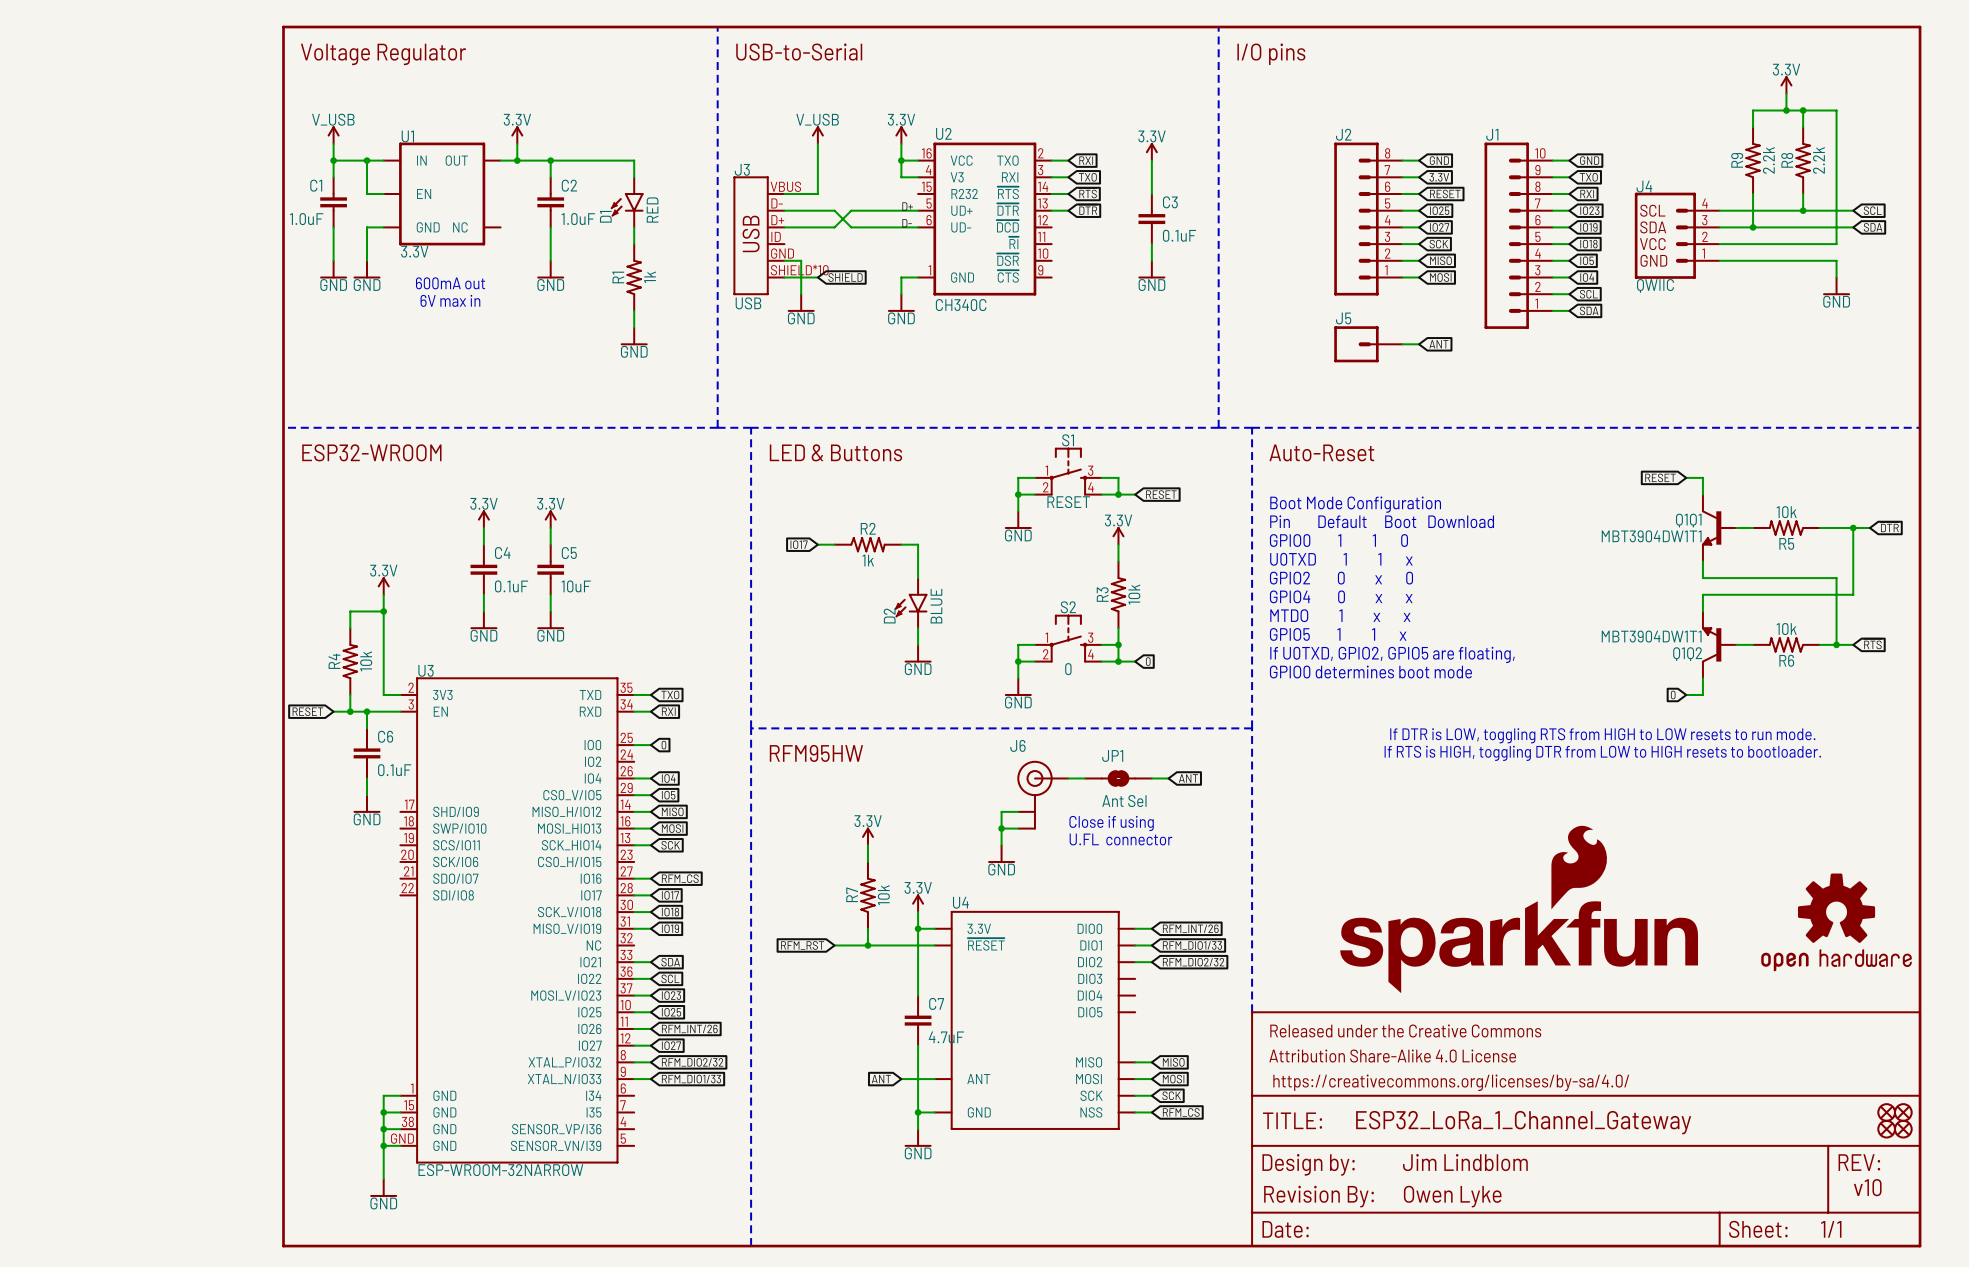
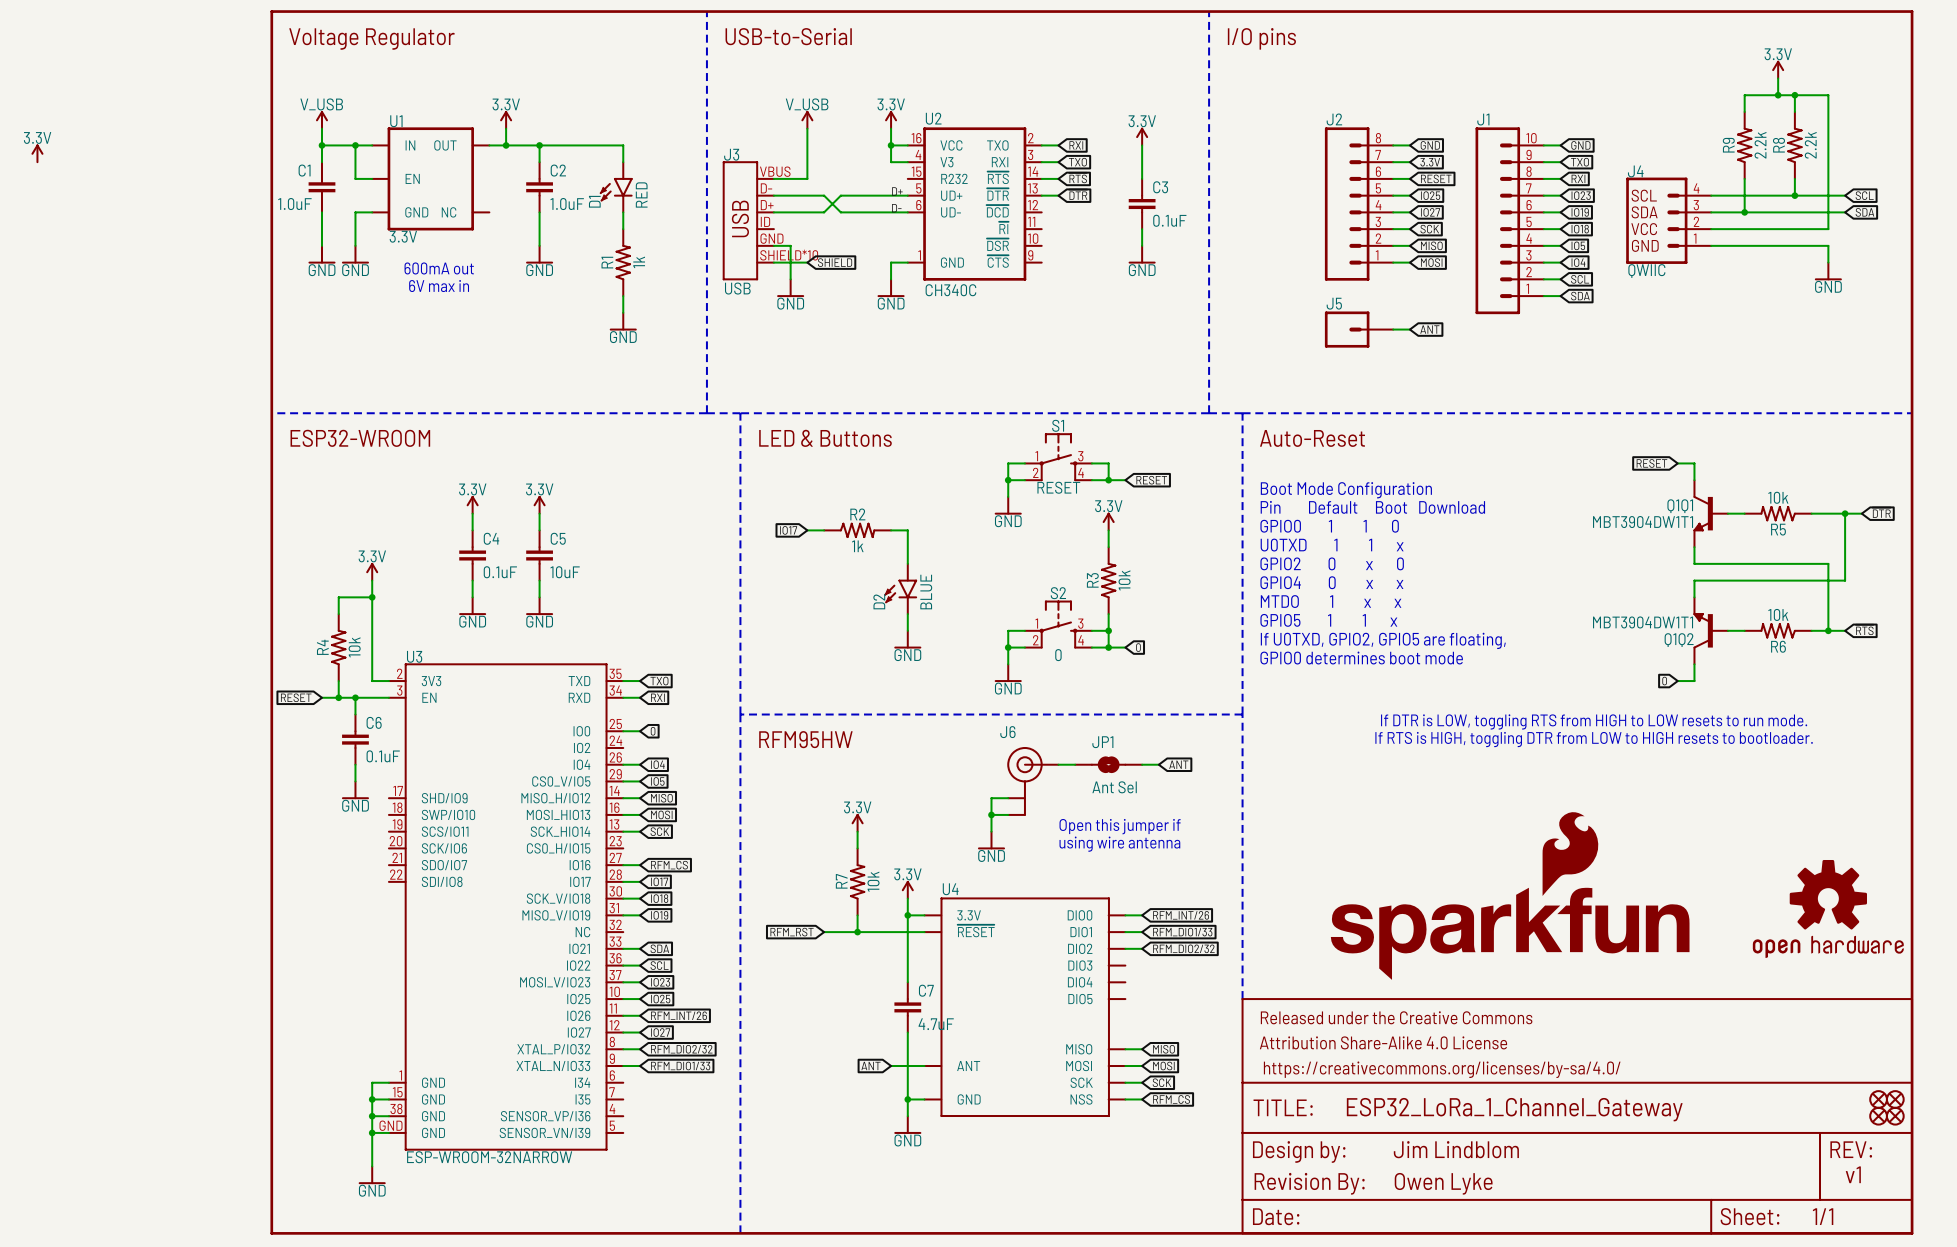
power symbol: none -> 3.3V (37, 153)
text: Close if using (1111, 823) -> none
text: U.FL connector (1120, 839) -> Open this jumper if (1120, 826)
text: none -> using wire antenna (1119, 844)
text: v10 (1867, 1187) -> v1 (1853, 1174)

